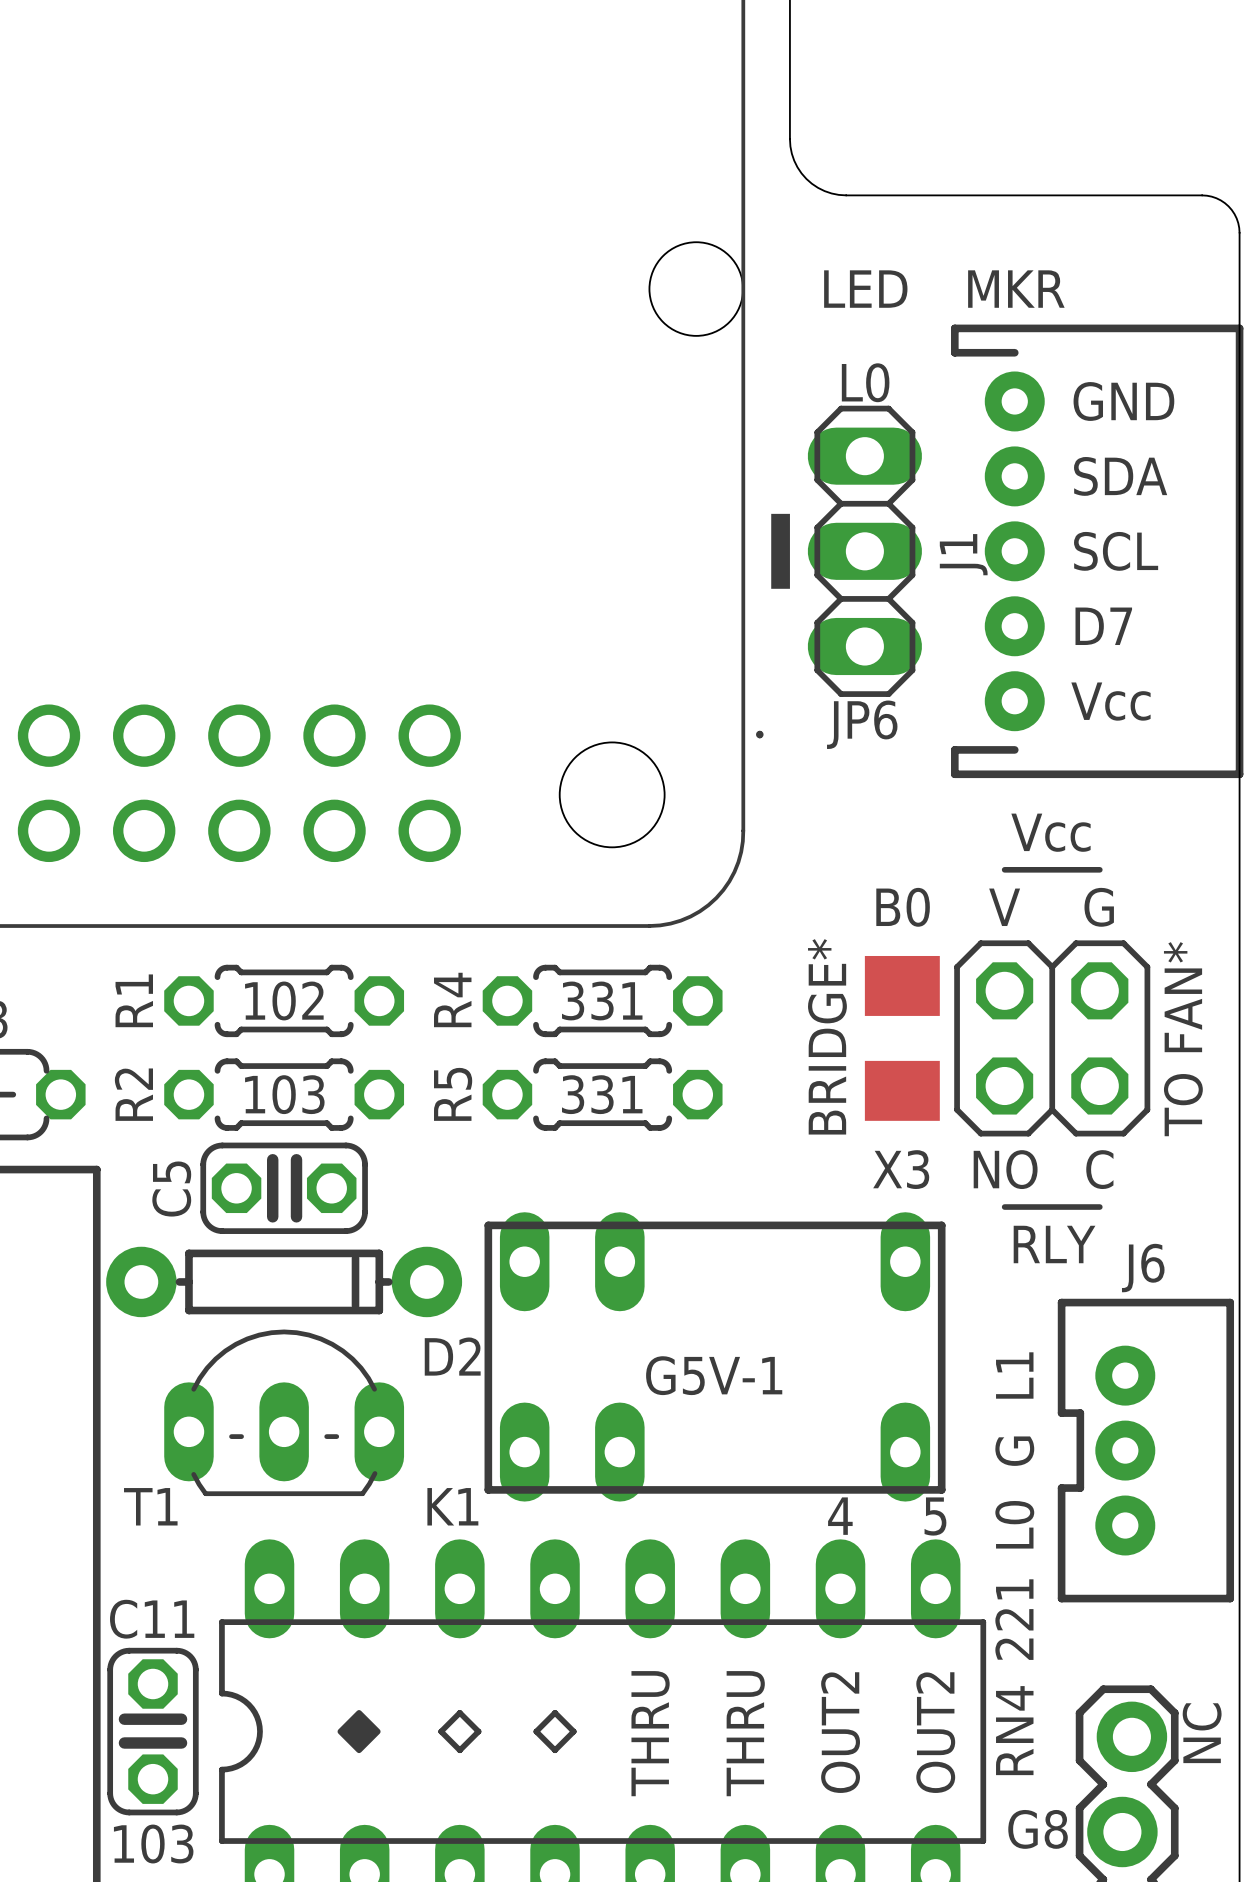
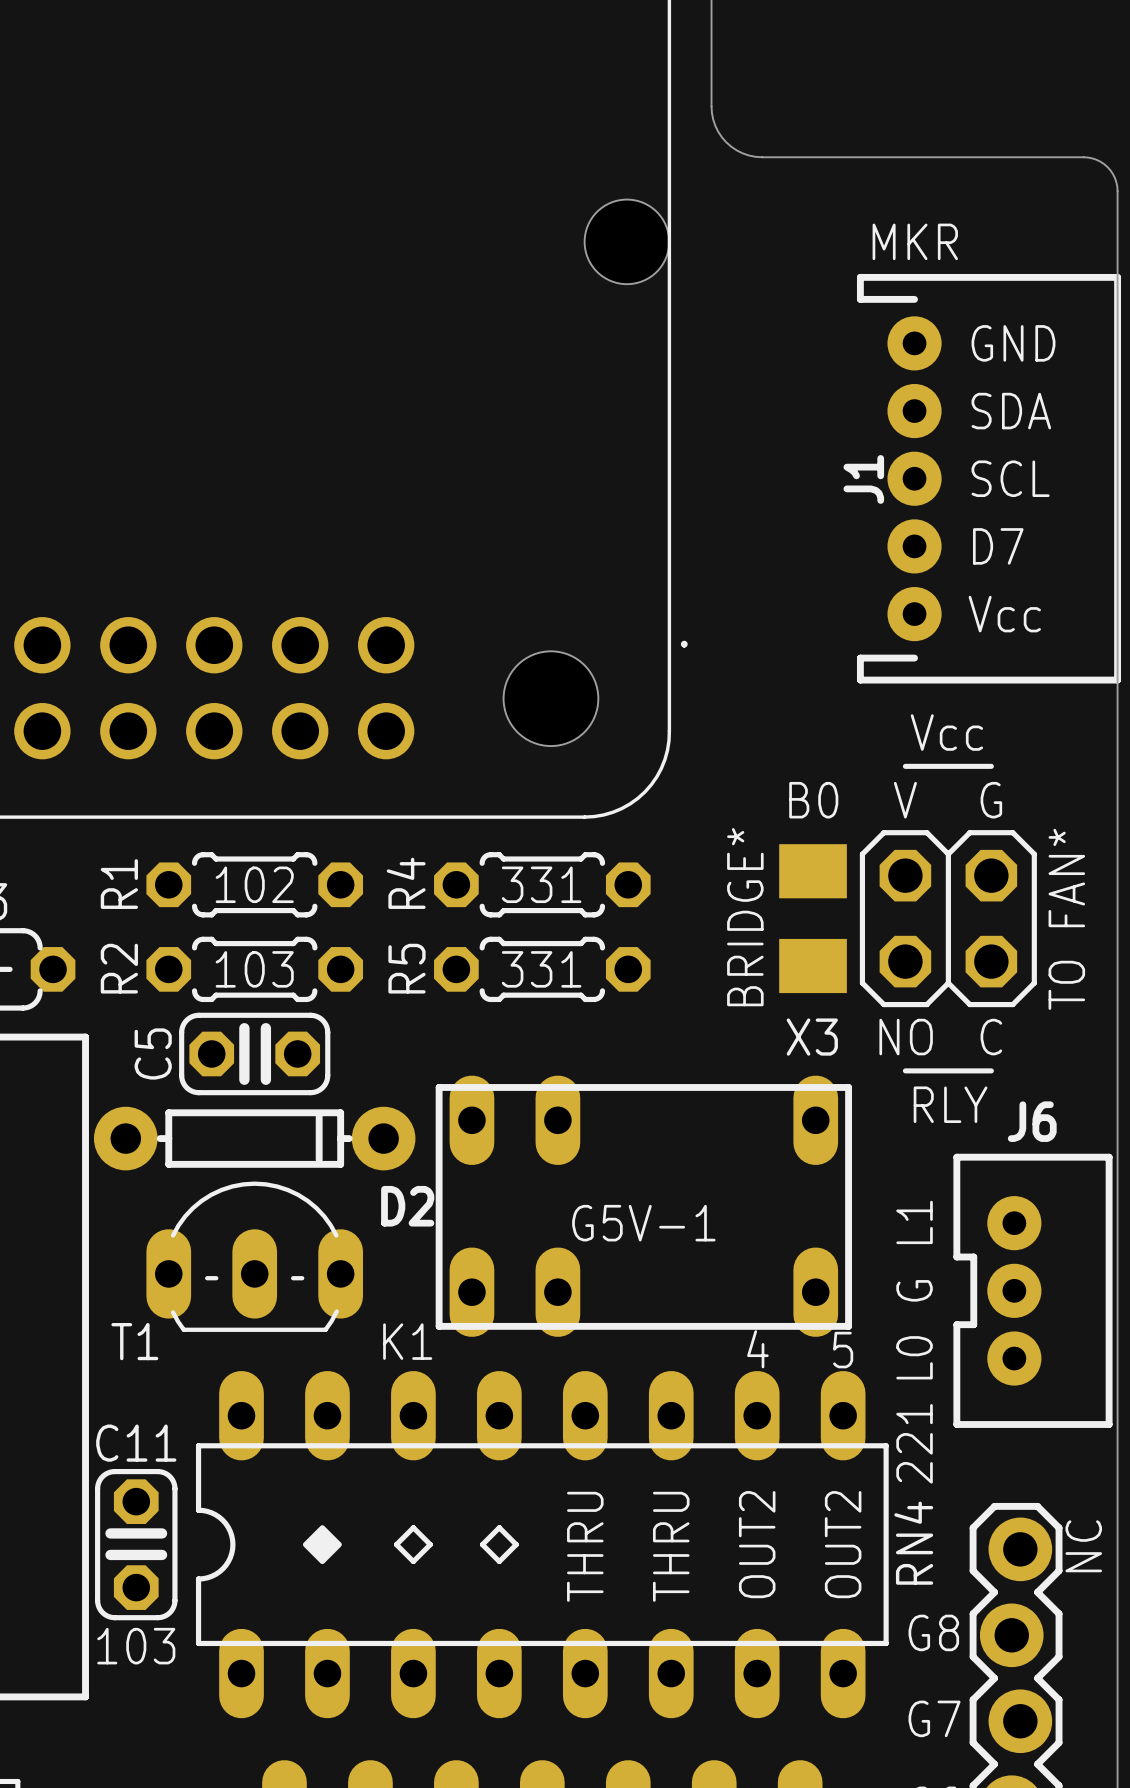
text: LED (865, 289) -> none
text: L0 (865, 382) -> none
drawing: [771, 513, 790, 589] -> none
JP6: (864, 551) -> none

